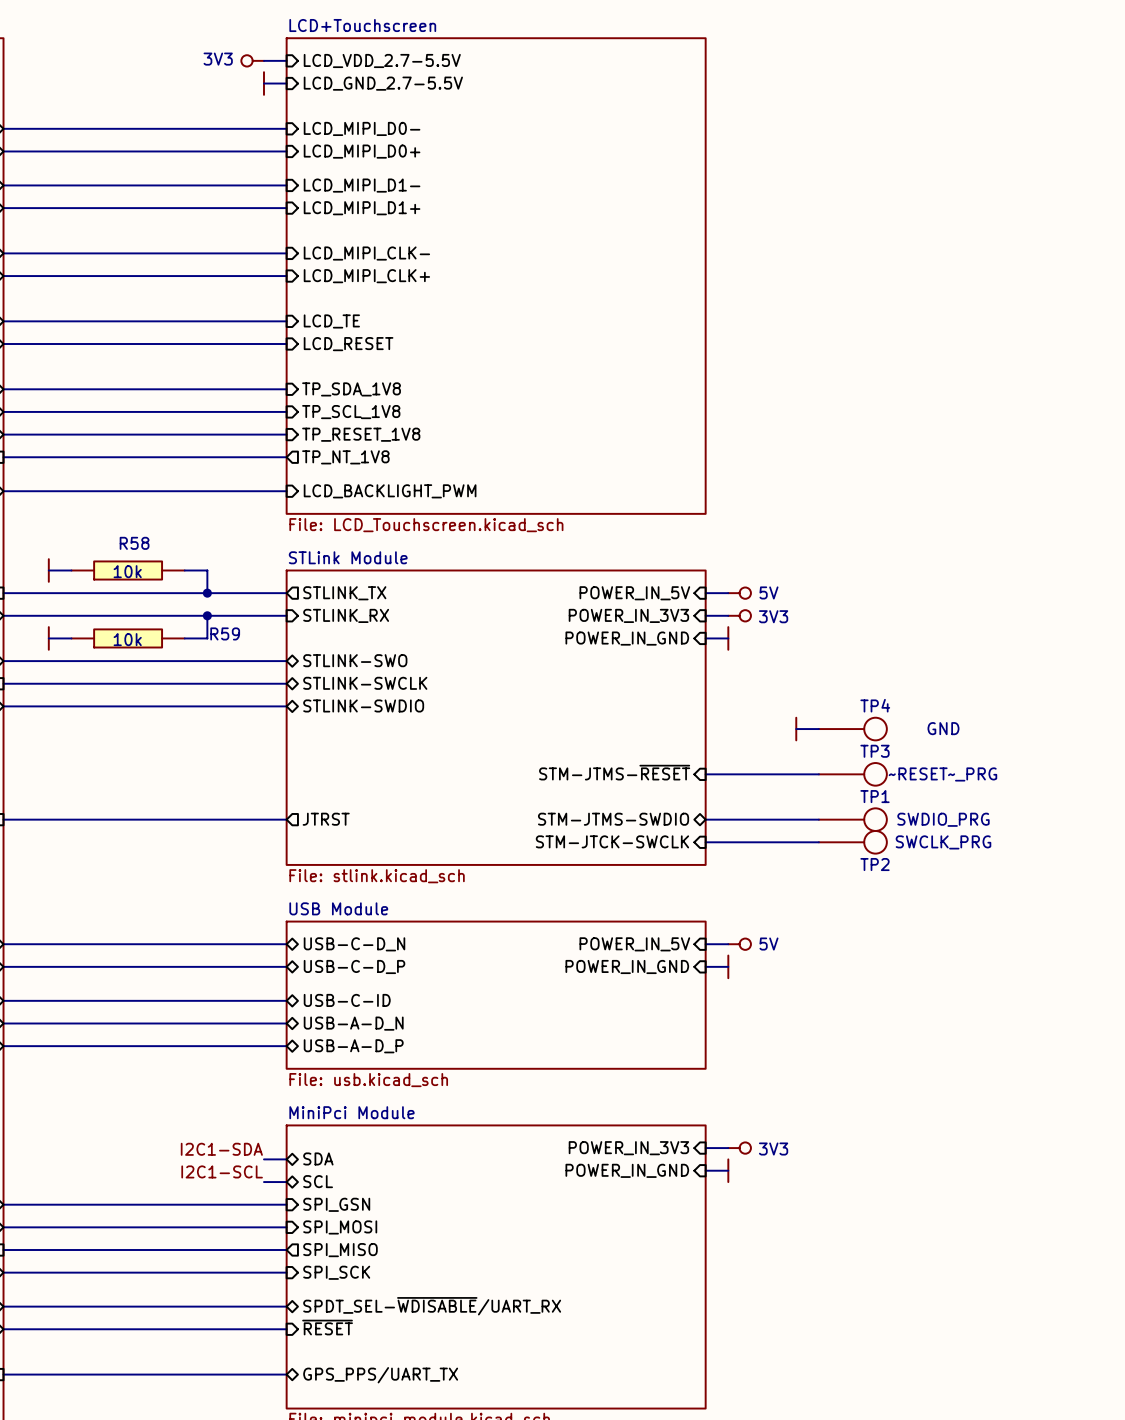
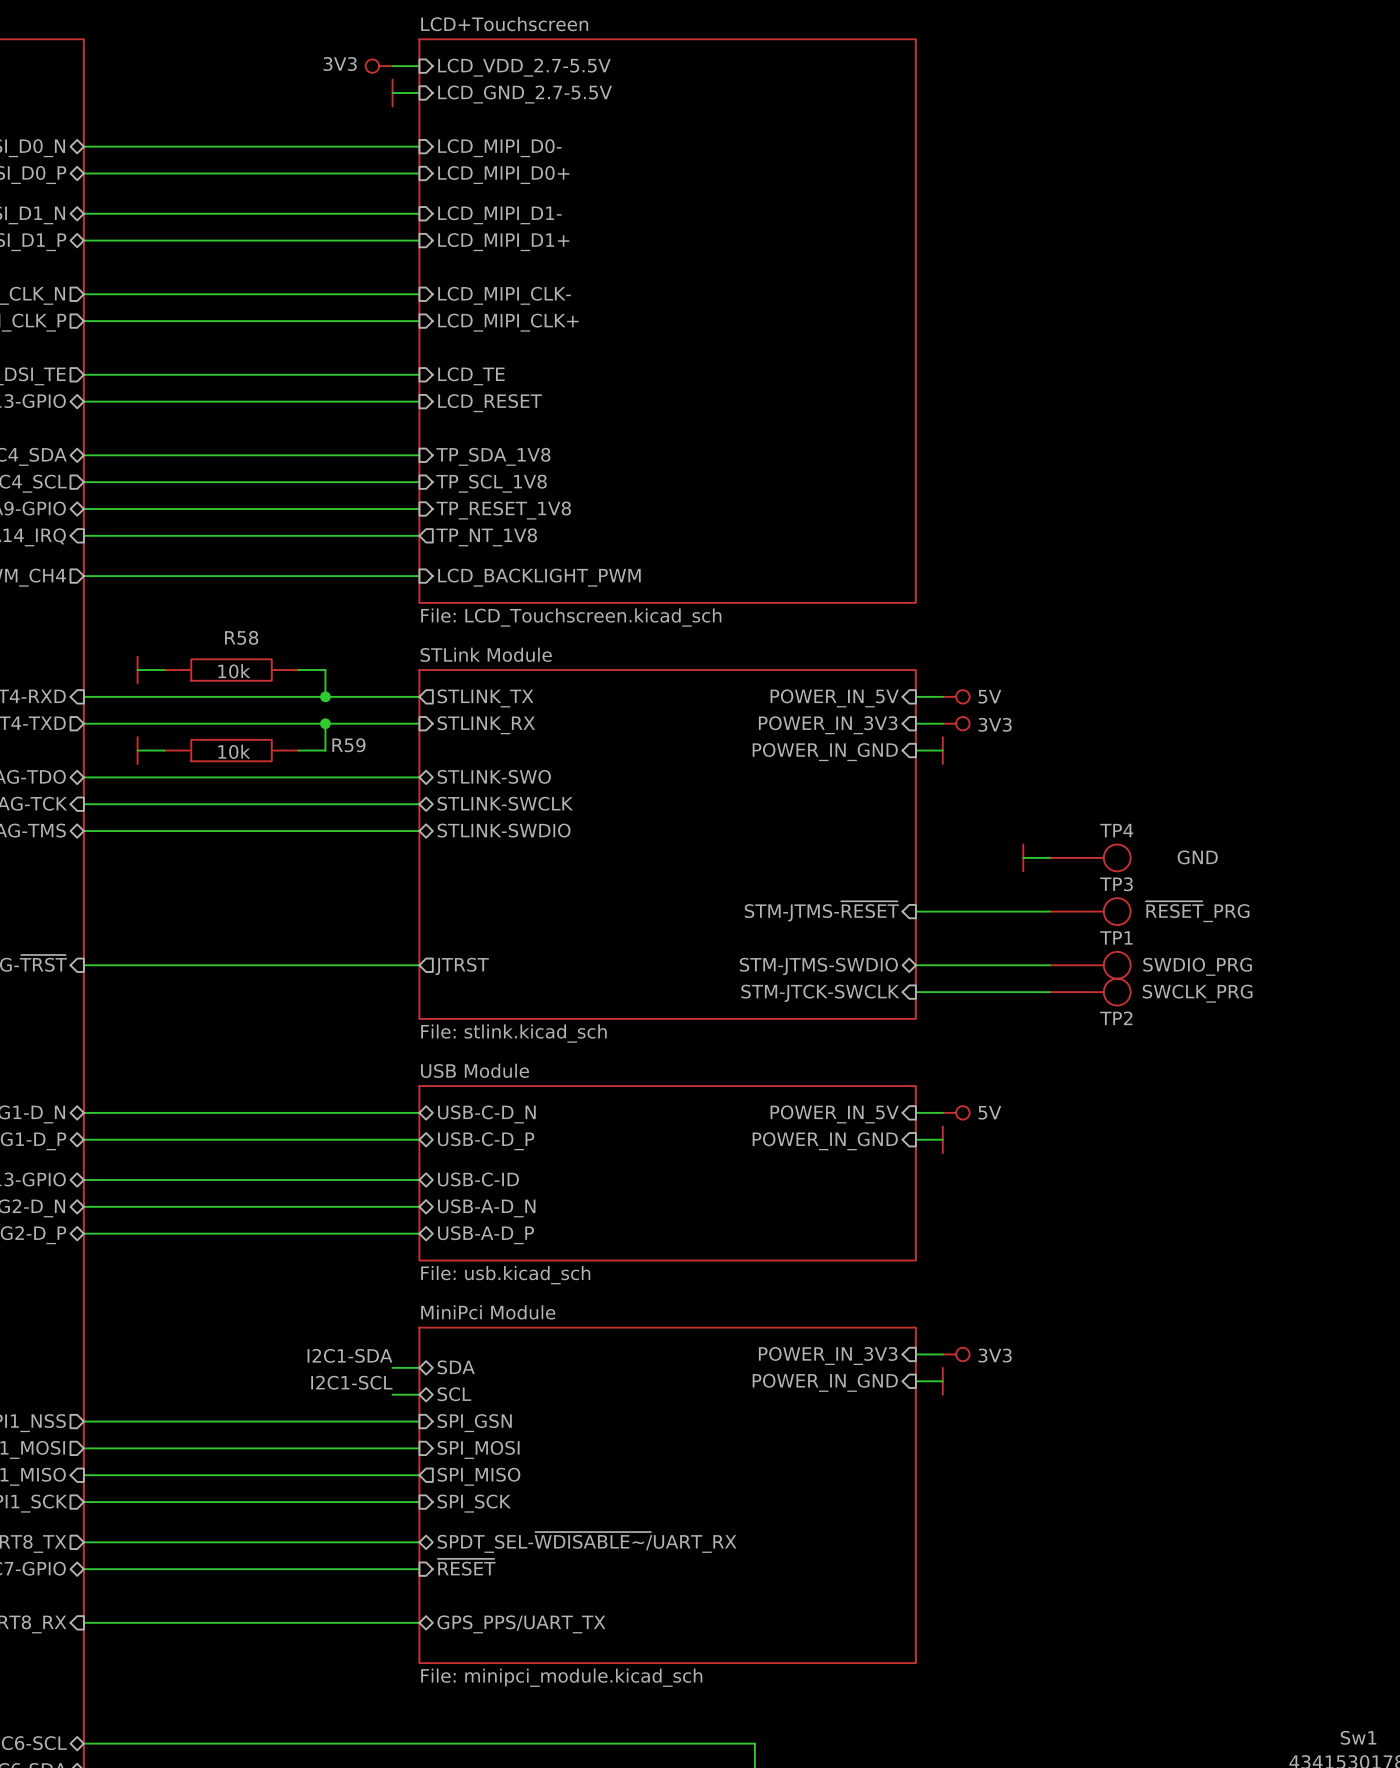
TP3 value: ~RESET~_PRG (942, 774) -> ~{RESET}_PRG (1197, 911)
sheet pin: SPDT_SEL-~{WDISABLE}/UART_RX (432, 1306) -> SPDT_SEL-~{WDISABLE~/}UART_RX (587, 1542)

